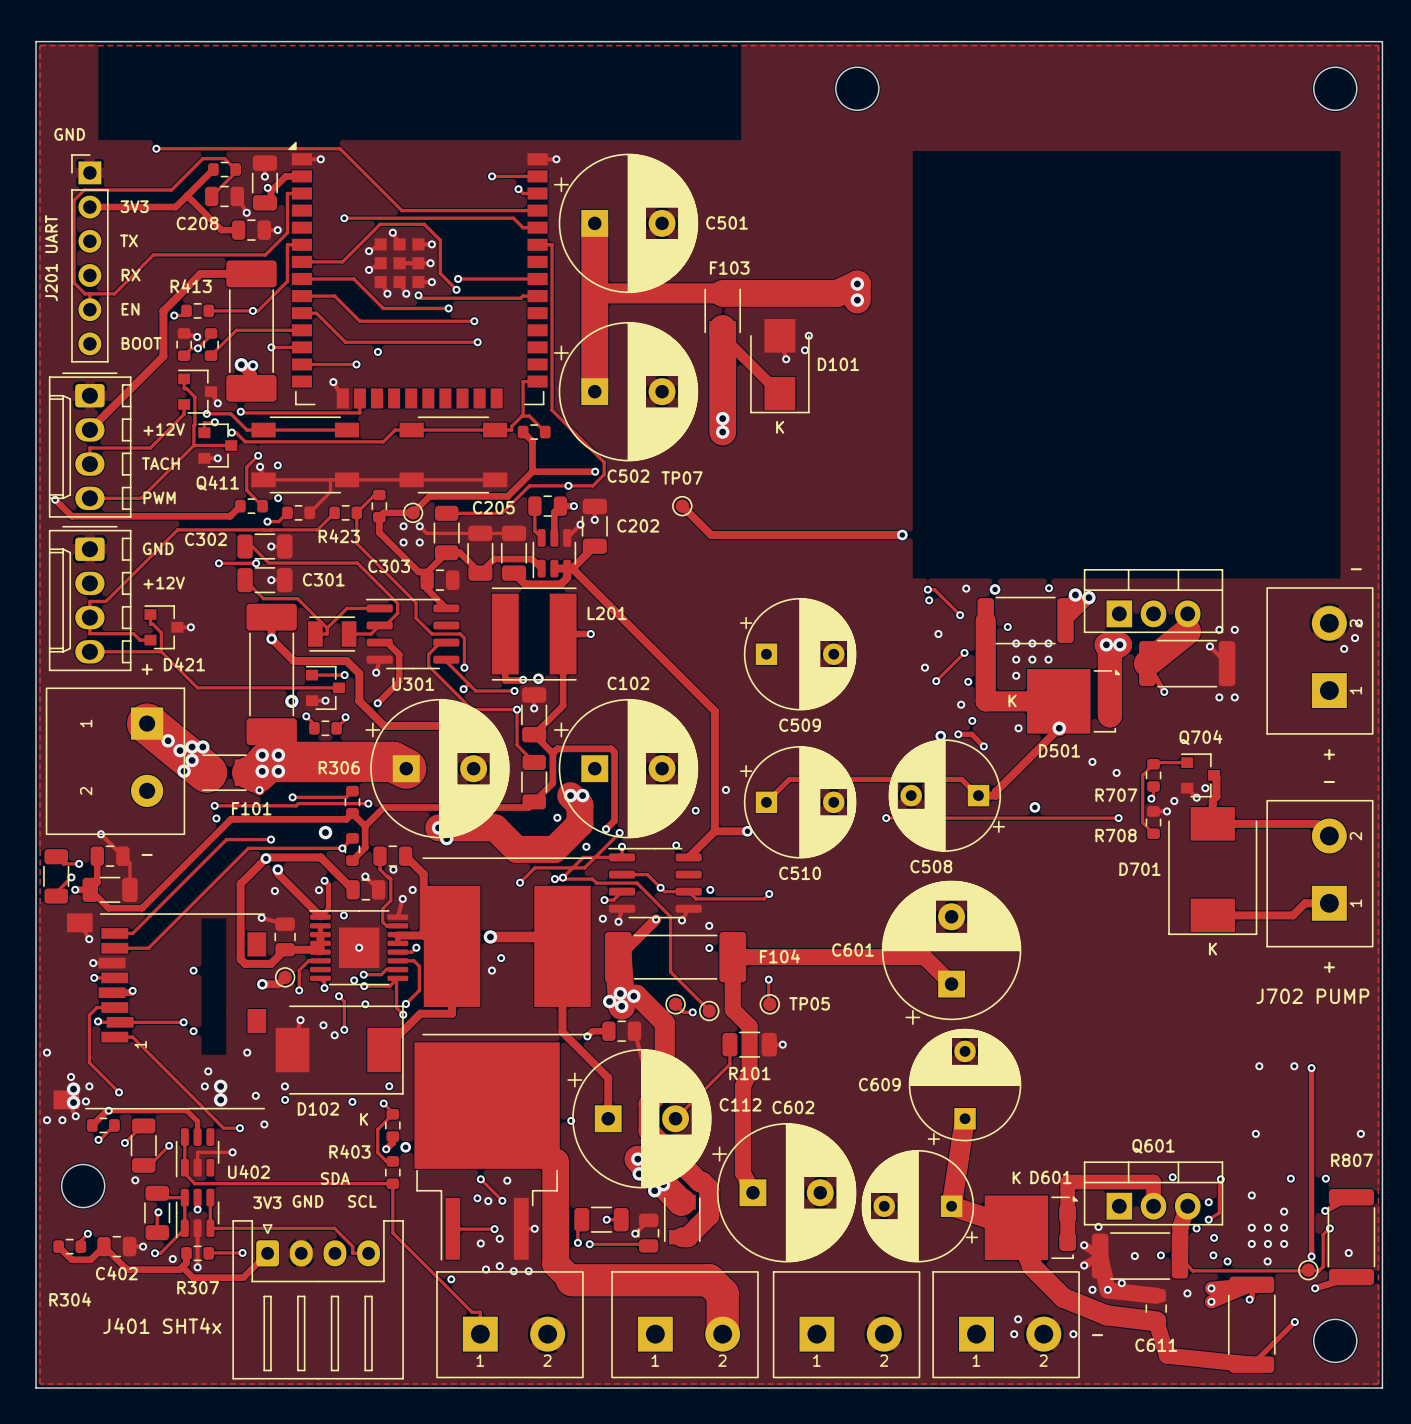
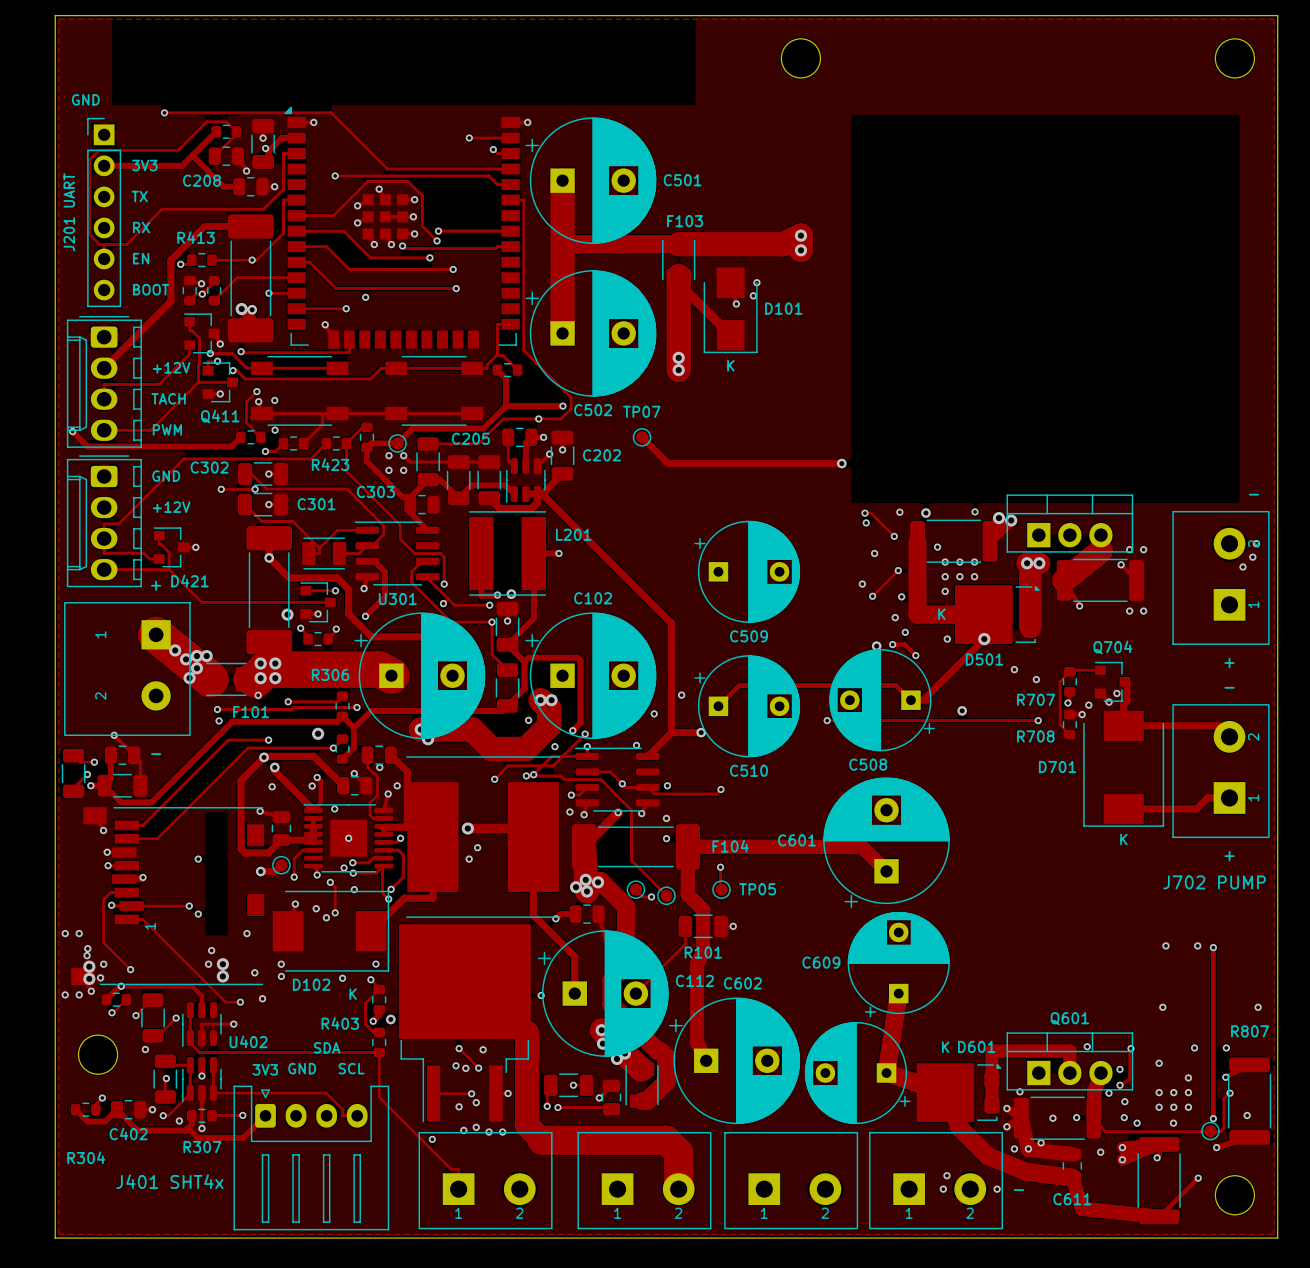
via: none -> (79, 933)
via: none -> (87, 948)

